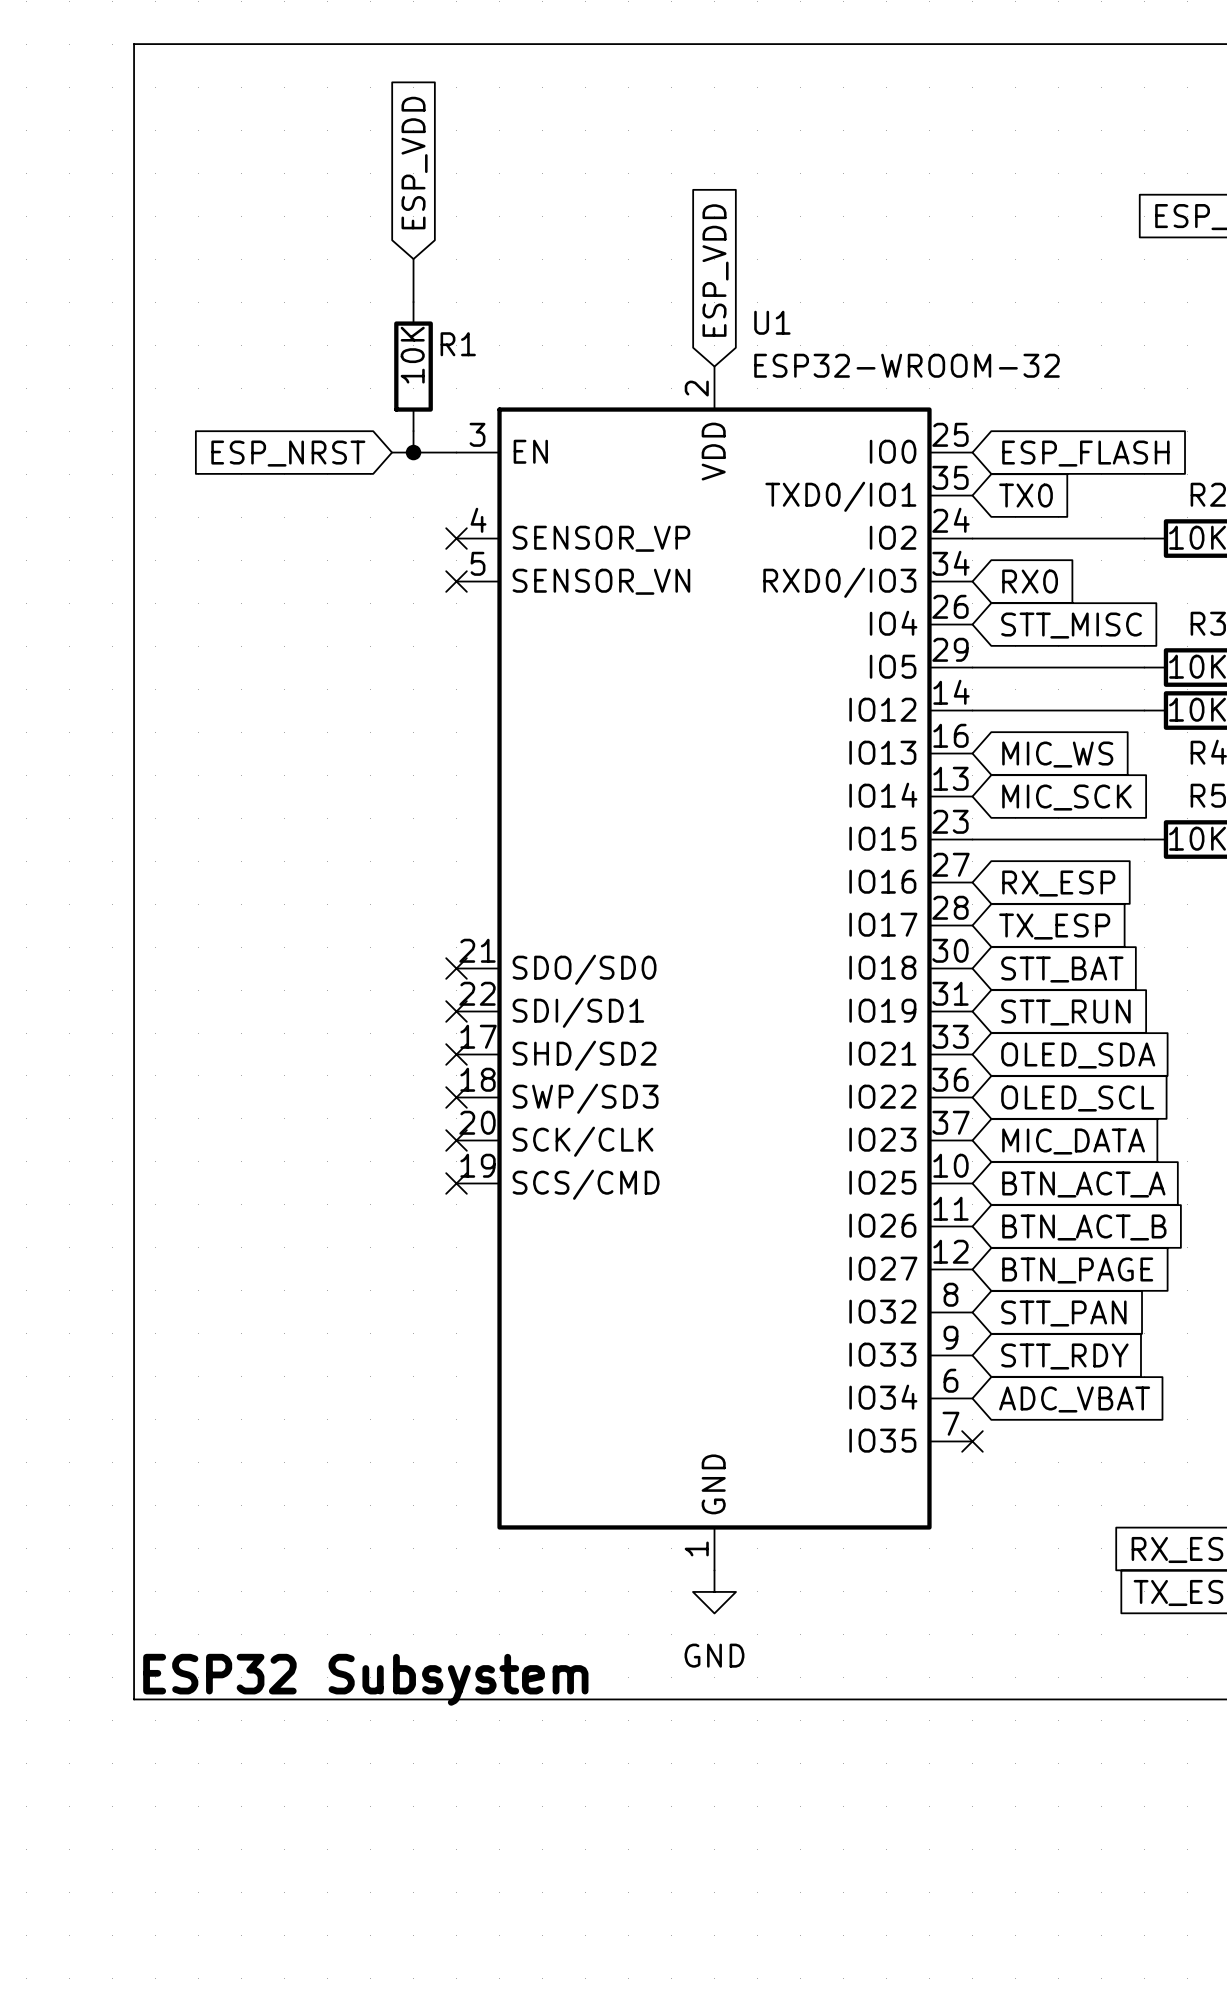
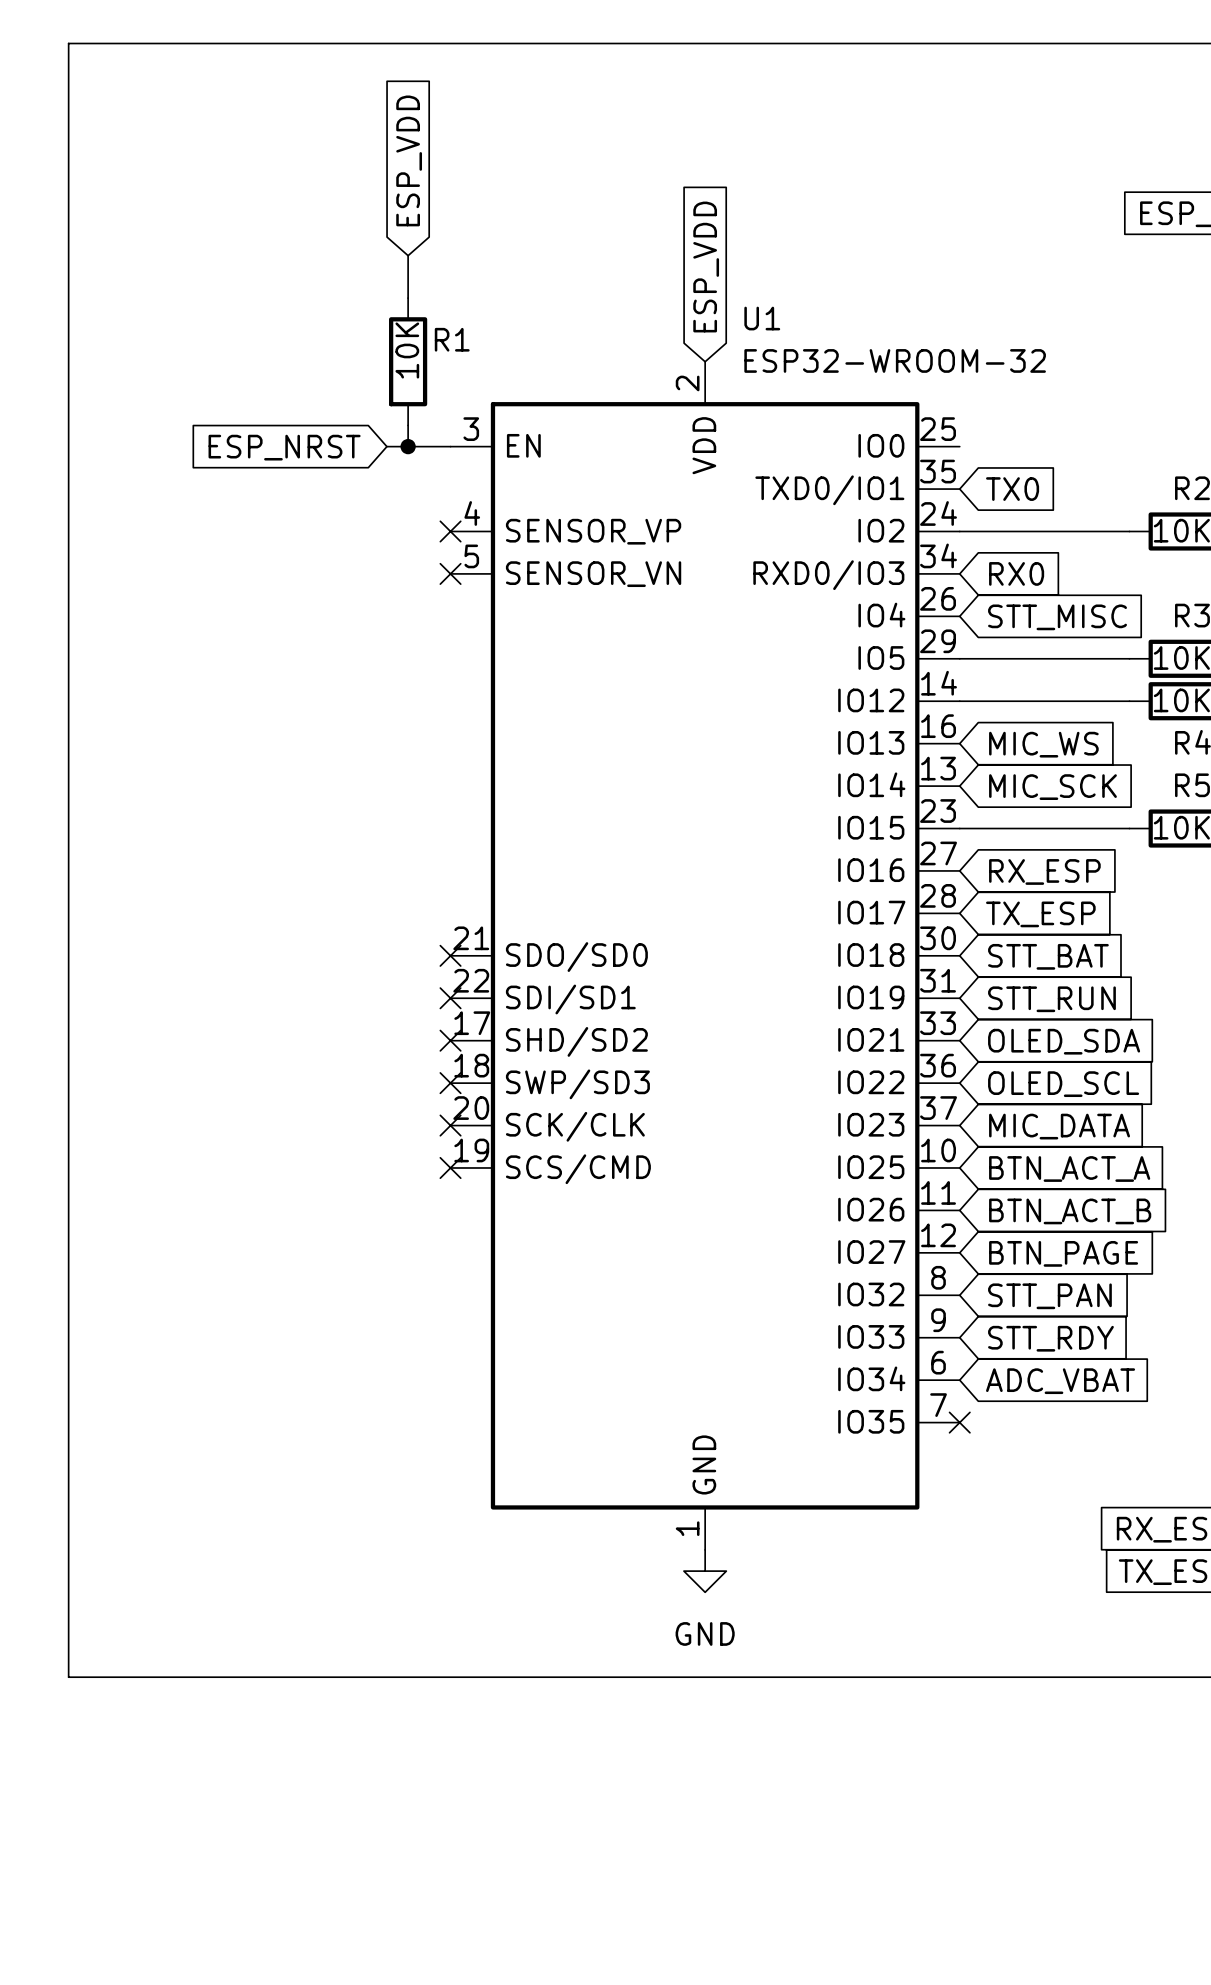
line: (134, 44) (134, 1699) -> (132, 43) (68, 43) (68, 1677) (132, 1677)
global label: ESP_FLASH (1085, 453) -> none
text: ESP32 Subsystem (365, 1679) -> none

